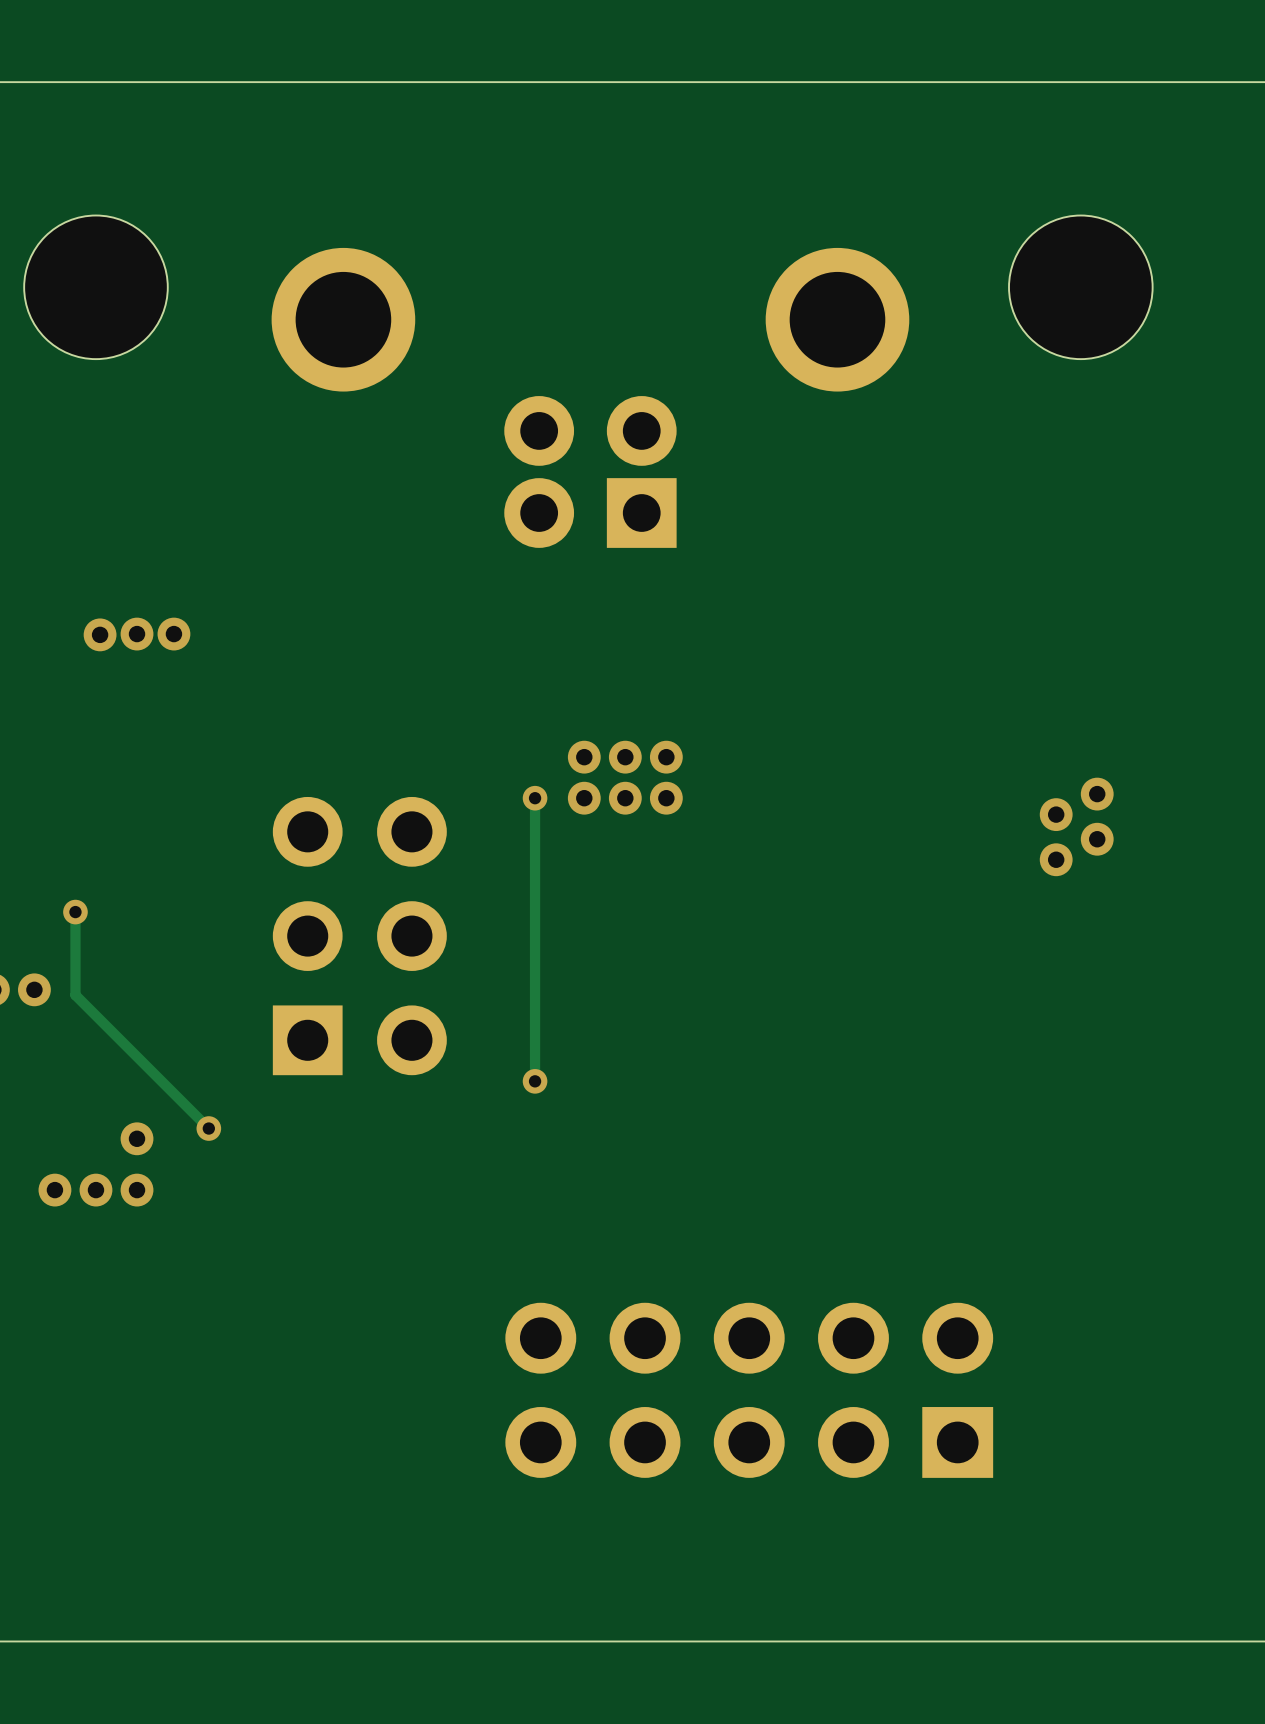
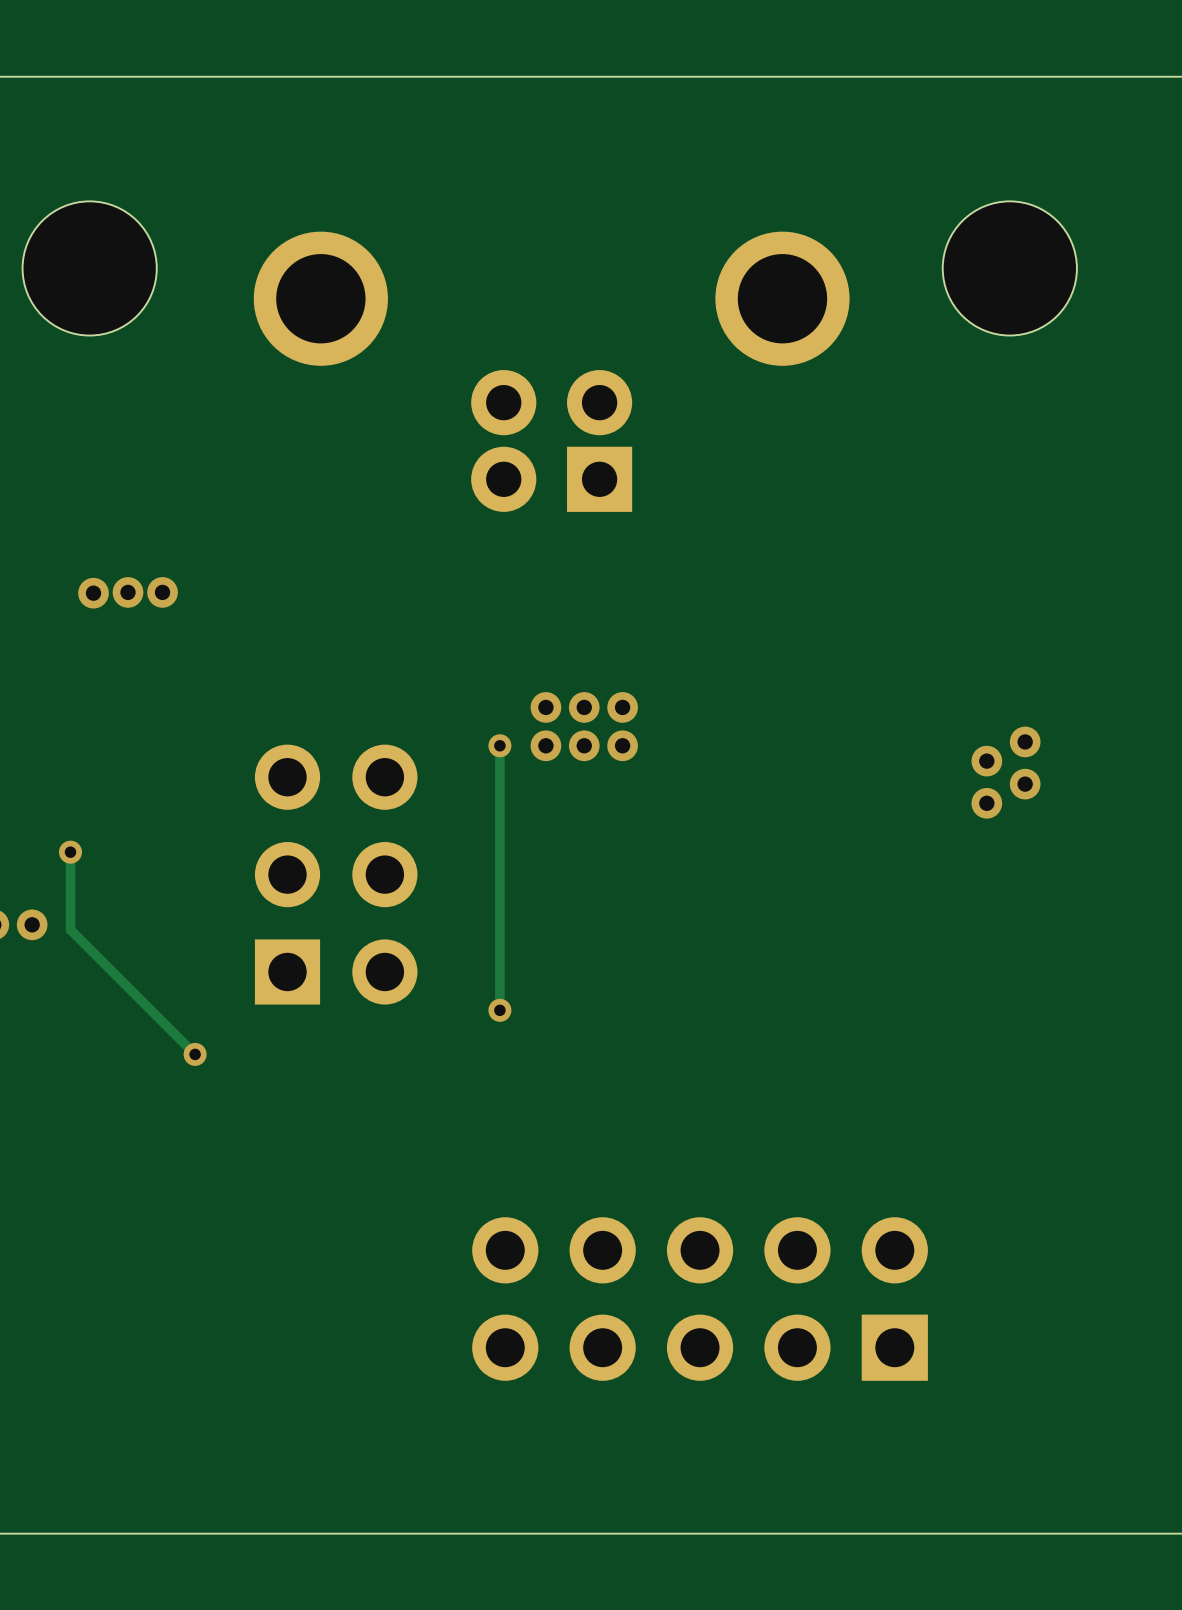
via: (137, 1138) -> none
via: (54, 1190) -> none
via: (95, 1190) -> none
via: (137, 1190) -> none

